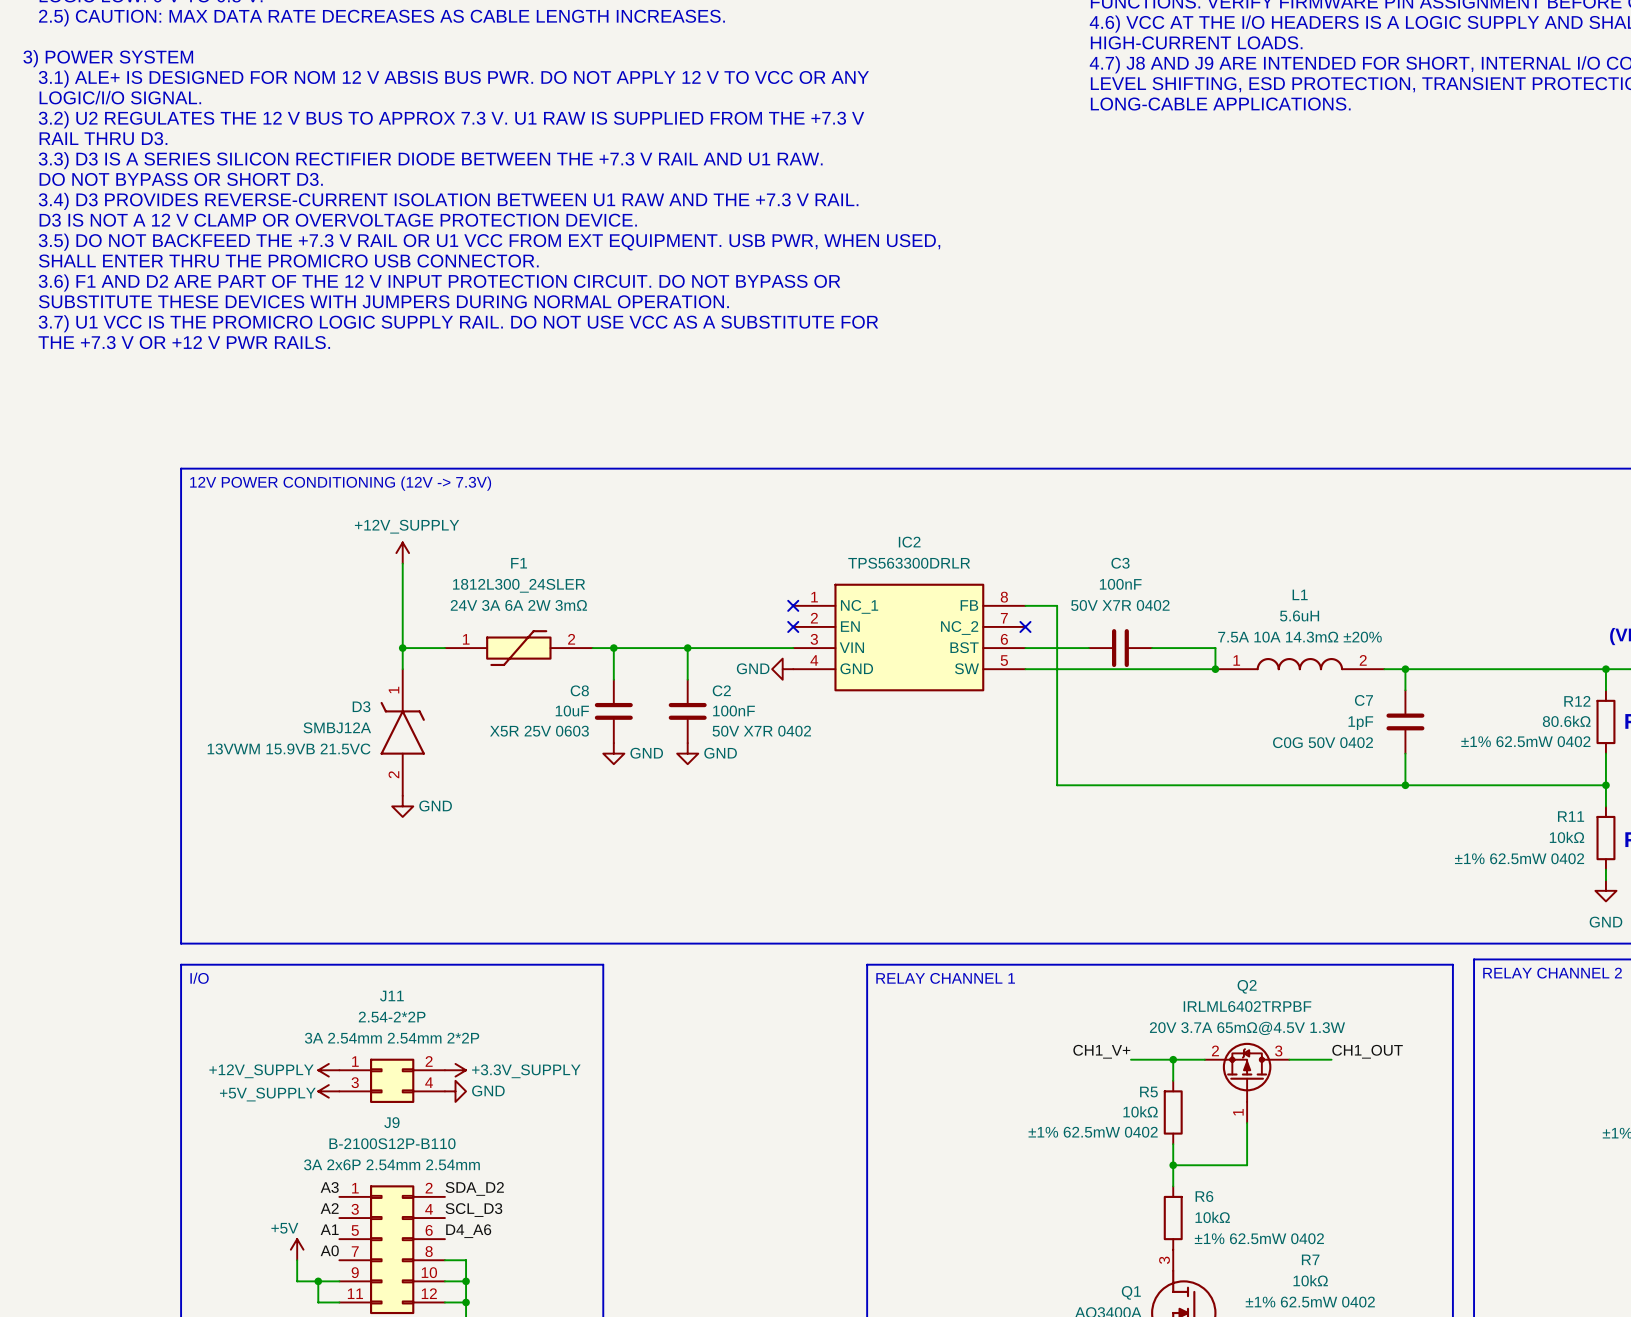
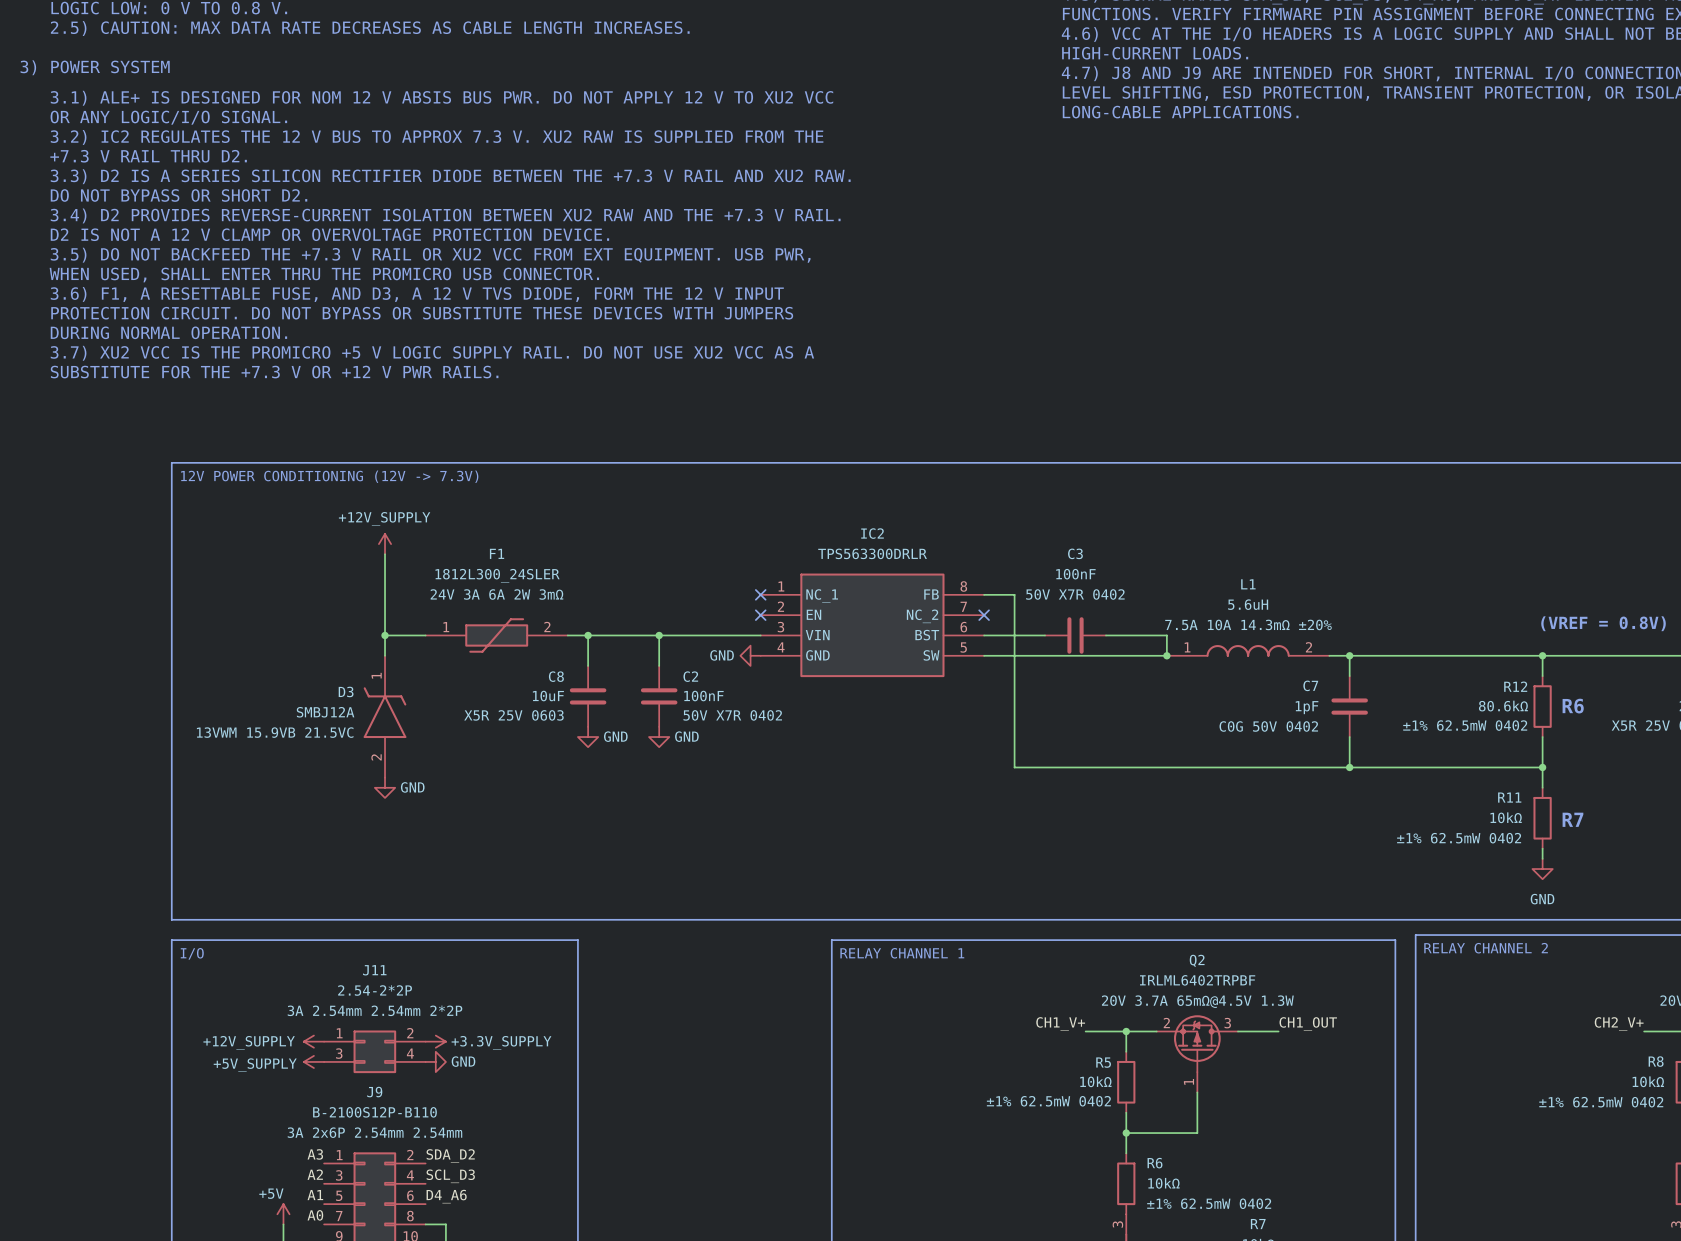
text: 3.1) ALE+ IS DESIGNED FOR NOM 12 V ABSIS BUS PWR. DO NOT APPLY 12 V TO VCC OR ANY (453, 79) -> 3.1) ALE+ IS DESIGNED FOR NOM 12 V ABSIS BUS PWR. DO NOT APPLY 12 V TO XU2 VCC (441, 98)
text: LOGIC/I/O SIGNAL. (120, 97) -> OR ANY LOGIC/I/O SIGNAL. (168, 117)
text: 3.2) U2 REGULATES THE 12 V BUS TO APPROX 7.3 V. U1 RAW IS SUPPLIED FROM THE +7.3 V (451, 119) -> 3.2) IC2 REGULATES THE 12 V BUS TO APPROX 7.3 V. XU2 RAW IS SUPPLIED FROM THE (437, 137)
text: RAIL THRU D3. (103, 138) -> +7.3 V RAIL THRU D2. (148, 156)
text: 3.3) D3 IS A SERIES SILICON RECTIFIER DIODE BETWEEN THE +7.3 V RAIL AND U1 RAW. (430, 160) -> 3.3) D2 IS A SERIES SILICON RECTIFIER DIODE BETWEEN THE +7.3 V RAIL AND XU2 RAW. (450, 176)
text: DO NOT BYPASS OR SHORT D3. (181, 179) -> DO NOT BYPASS OR SHORT D2. (179, 195)
text: 3.4) D3 PROVIDES REVERSE-CURRENT ISOLATION BETWEEN U1 RAW AND THE +7.3 V RAIL. (448, 201) -> 3.4) D2 PROVIDES REVERSE-CURRENT ISOLATION BETWEEN XU2 RAW AND THE +7.3 V RAIL. (445, 215)
text: D3 IS NOT A 12 V CLAMP OR OVERVOLTAGE PROTECTION DEVICE. (338, 220) -> D2 IS NOT A 12 V CLAMP OR OVERVOLTAGE PROTECTION DEVICE. (329, 234)
text: 3.5) DO NOT BACKFEED THE +7.3 V RAIL OR U1 VCC FROM EXT EQUIPMENT. USB PWR, WHEN USED, (489, 242) -> 3.5) DO NOT BACKFEED THE +7.3 V RAIL OR XU2 VCC FROM EXT EQUIPMENT. USB PWR, (430, 255)
text: SHALL ENTER THRU THE PROMICRO USB CONNECTOR. (288, 261) -> WHEN USED, SHALL ENTER THRU THE PROMICRO USB CONNECTOR. (324, 275)
text: 3.6) F1 AND D2 ARE PART OF THE 12 V INPUT PROTECTION CIRCUIT. DO NOT BYPASS OR (439, 282) -> none
text: none -> 3.6) F1, A RESETTABLE FUSE, AND D3, A 12 V TVS DIODE, FORM THE 12 V INPUT (417, 294)
text: SUBSTITUTE THESE DEVICES WITH JUMPERS DURING NORMAL OPERATION. (383, 301) -> none
text: none -> PROTECTION CIRCUIT. DO NOT BYPASS OR SUBSTITUTE THESE DEVICES WITH JUMPERS (422, 313)
text: 3.7) U1 VCC IS THE PROMICRO LOGIC SUPPLY RAIL. DO NOT USE VCC AS A SUBSTITUTE FOR (458, 323) -> none
text: none -> DURING NORMAL OPERATION. (168, 332)
text: THE +7.3 V OR +12 V PWR RAILS. (184, 342) -> none
text: none -> 3.7) XU2 VCC IS THE PROMICRO +5 V LOGIC SUPPLY RAIL. DO NOT USE XU2 VCC AS A (432, 353)
text: none -> SUBSTITUTE FOR THE +7.3 V OR +12 V PWR RAILS. (274, 372)

